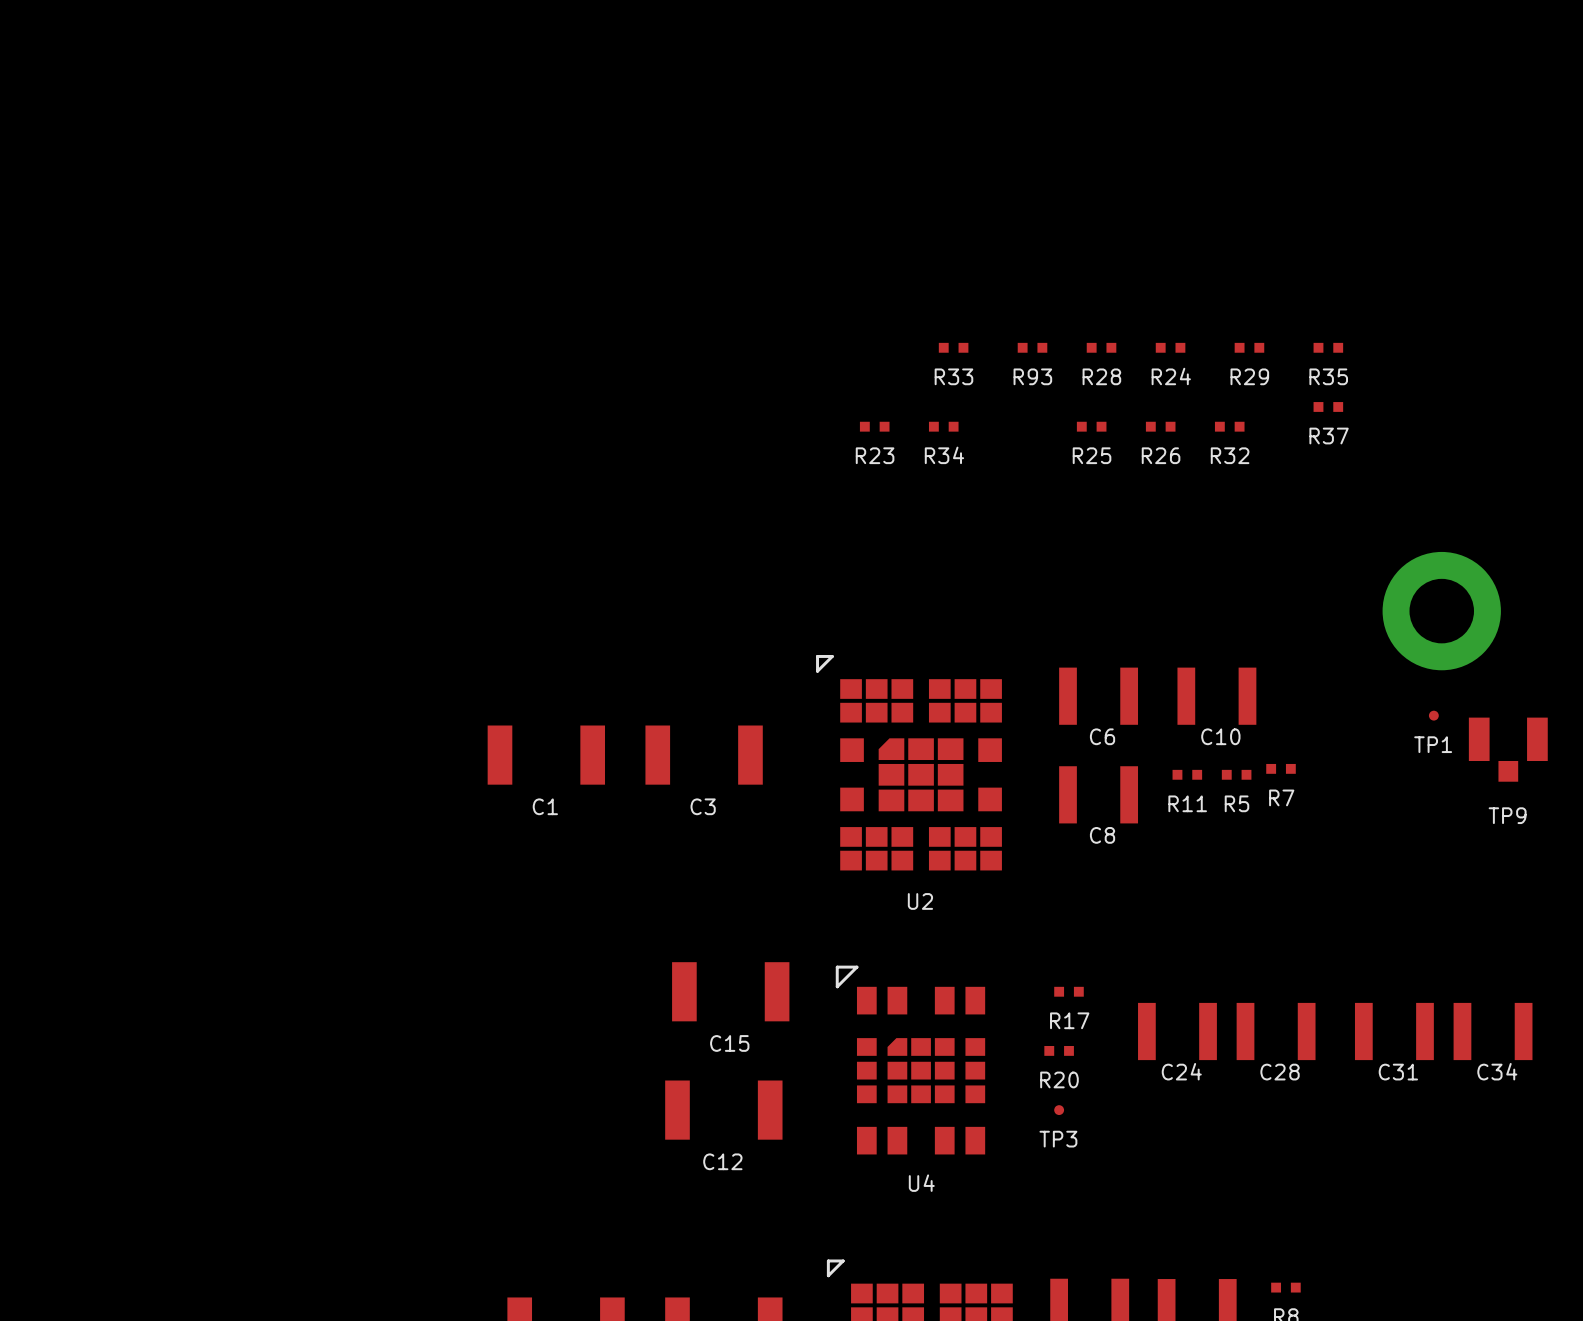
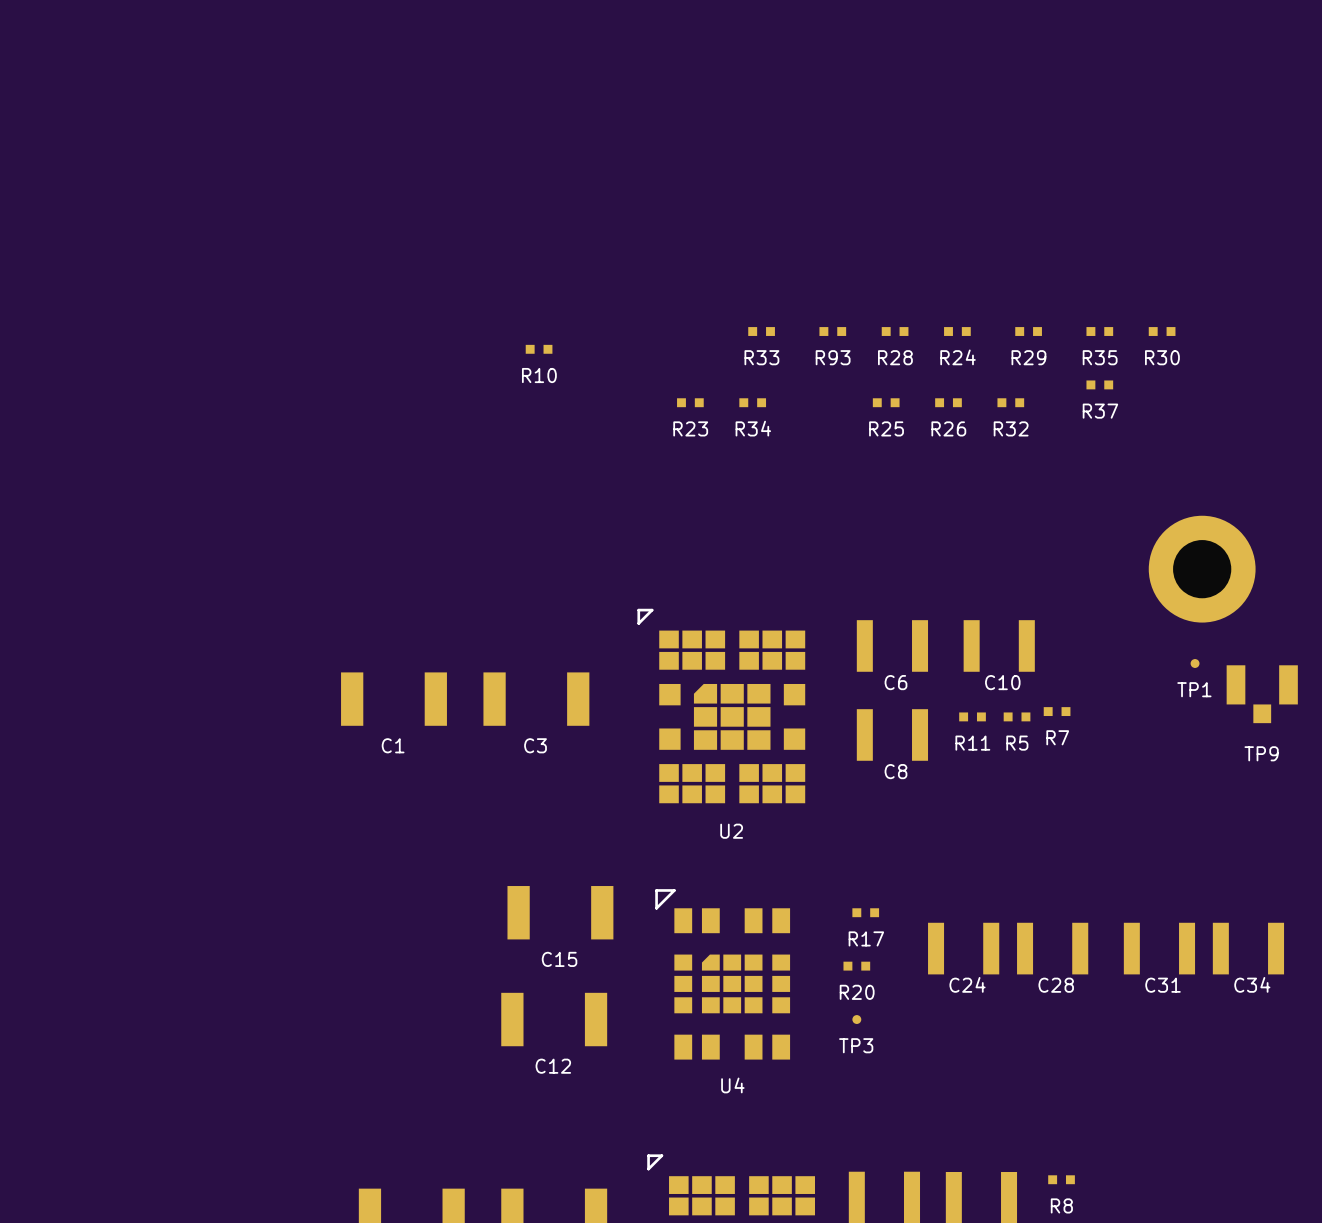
R30: none -> (1162, 331)
R10: none -> (539, 349)

